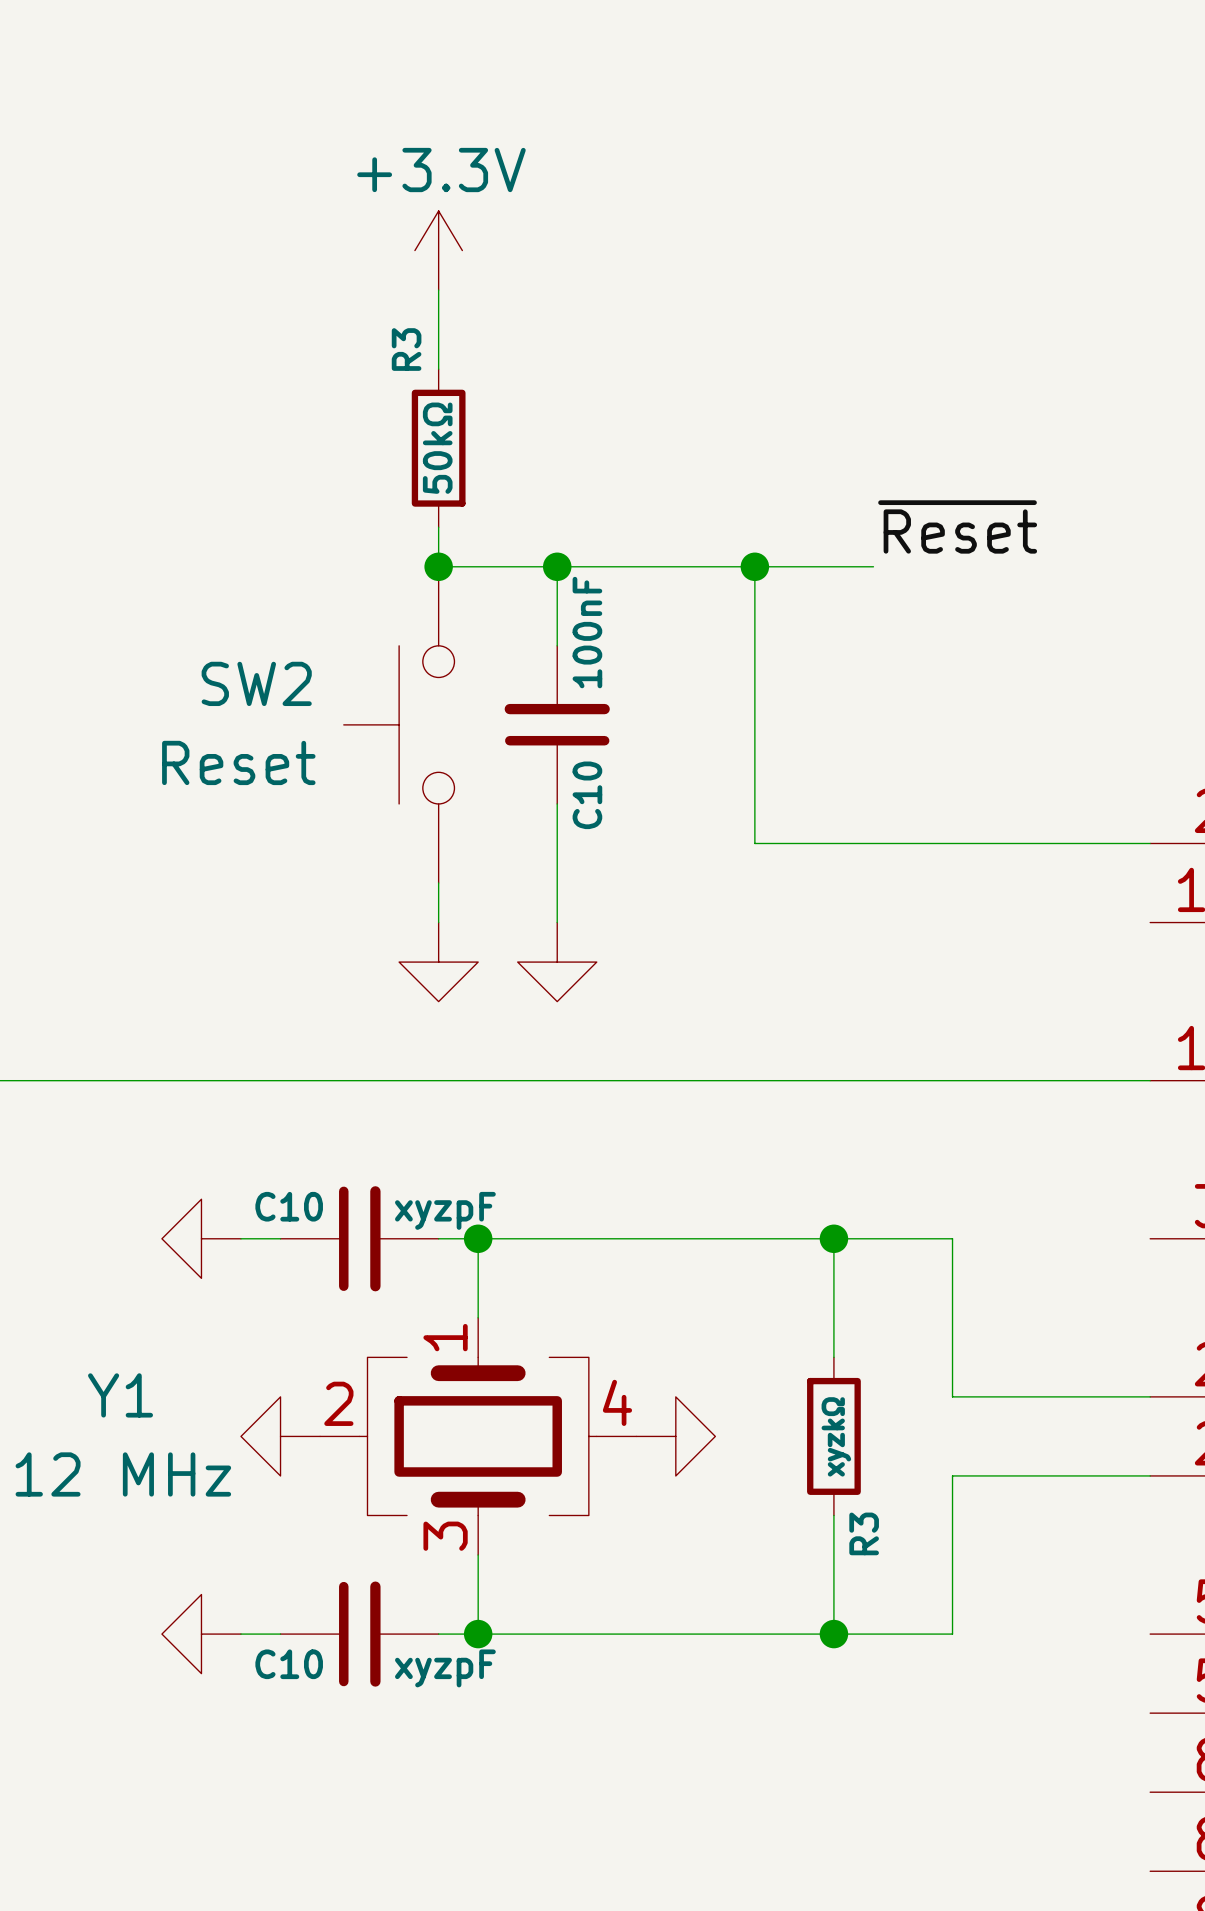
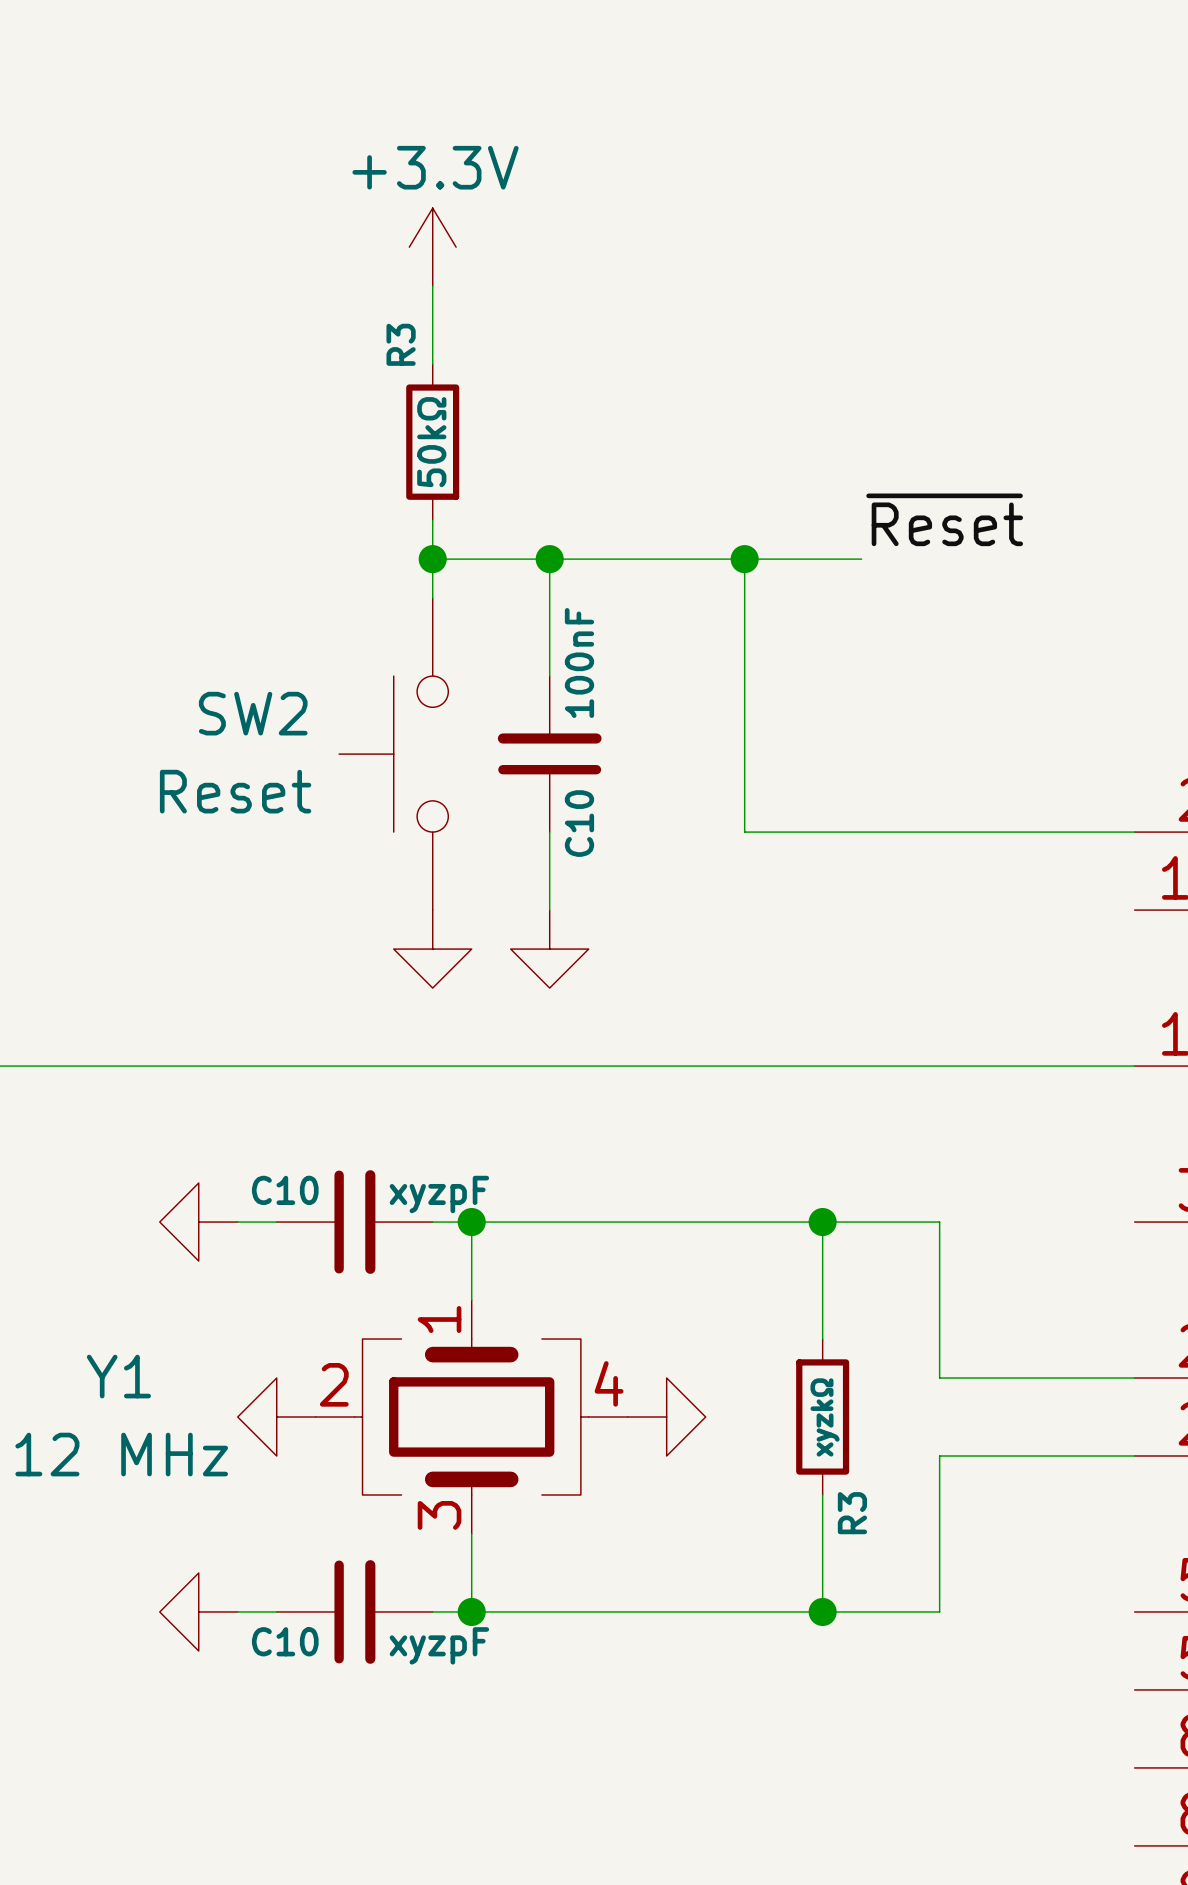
SW2 position: (399, 724) -> (393, 754)
C10 position: (557, 724) -> (549, 754)

